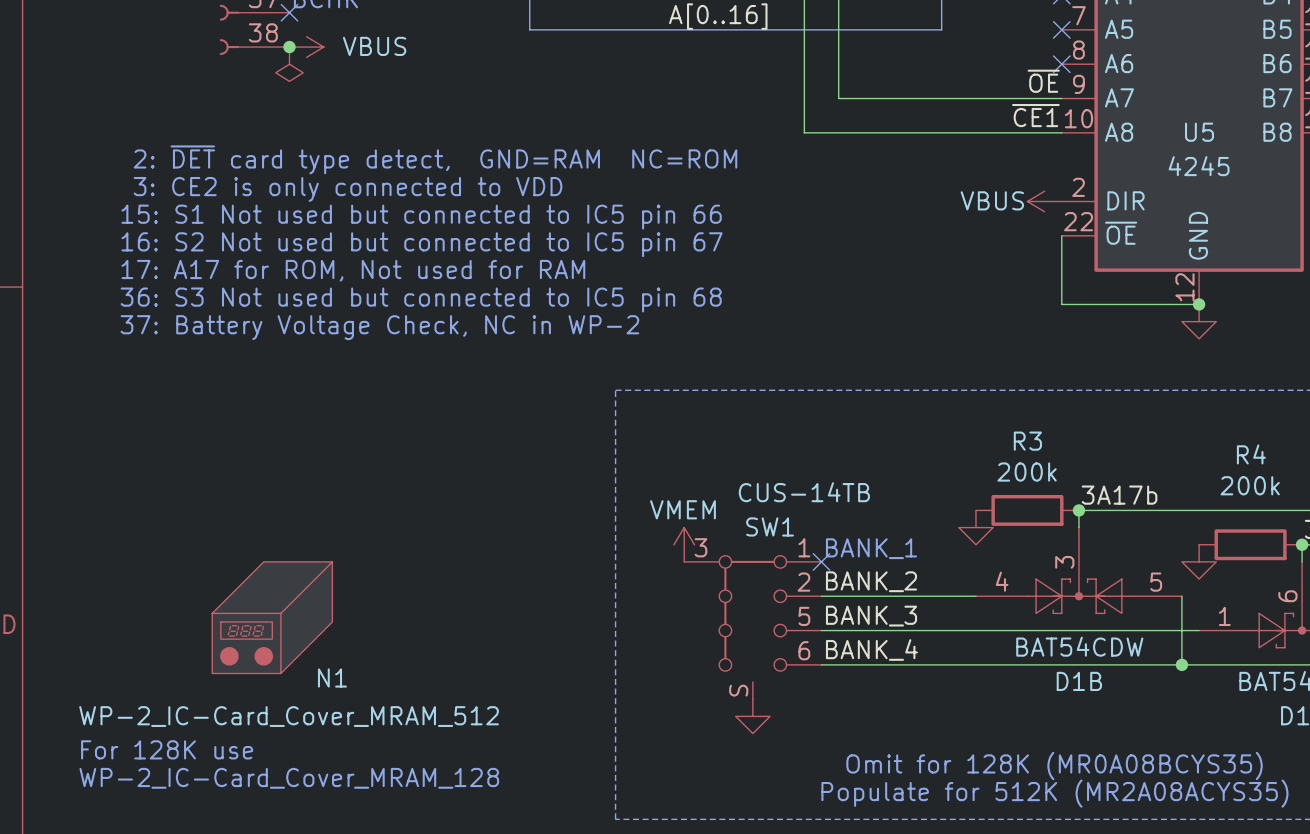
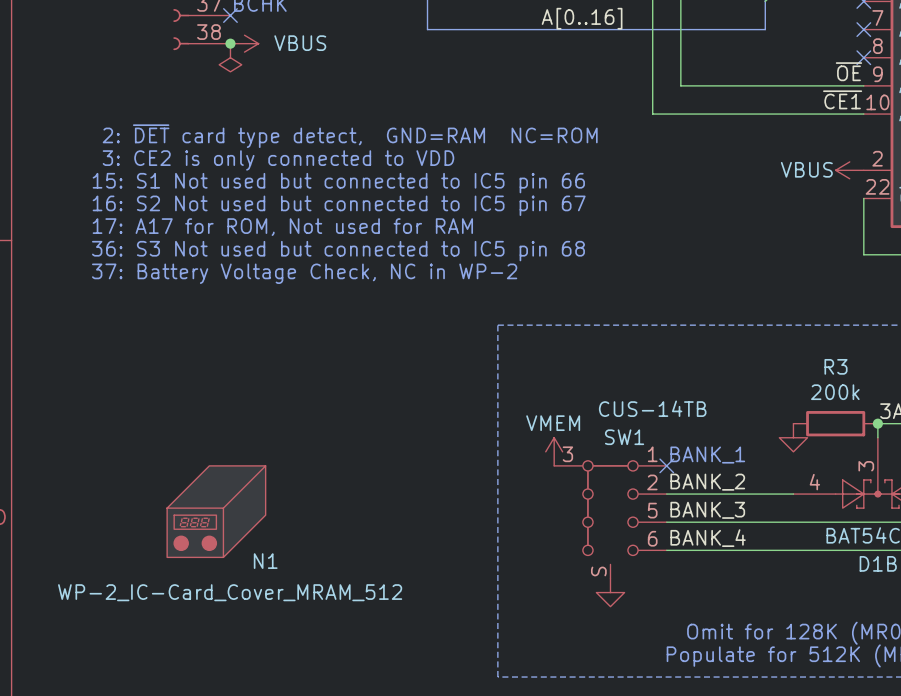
text: For 128K use (167, 749) -> none
text: WP-2_IC-Card_Cover_MRAM_128 (289, 778) -> none

